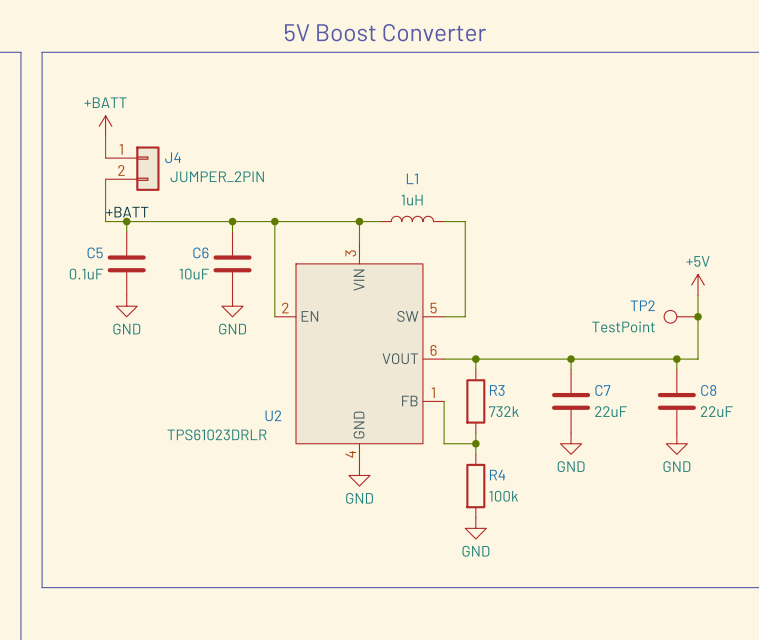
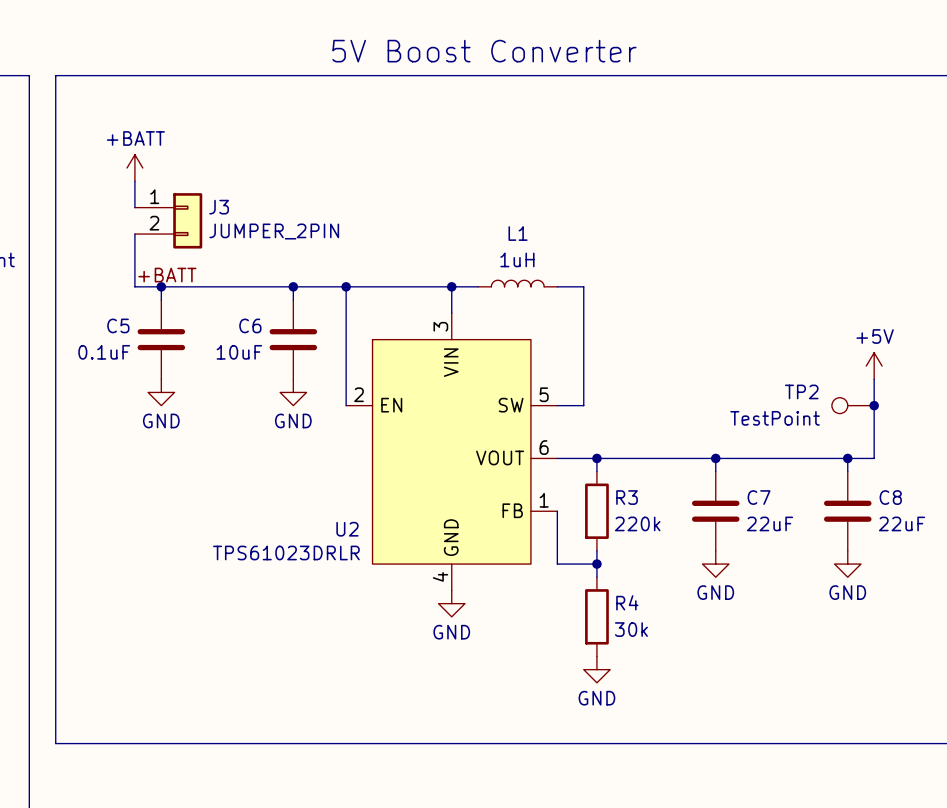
J4 name: J4 (173, 157) -> J3 (219, 207)
R3 value: 732k (503, 411) -> 220k (637, 523)
R4 value: 100k (503, 496) -> 30k (631, 629)

